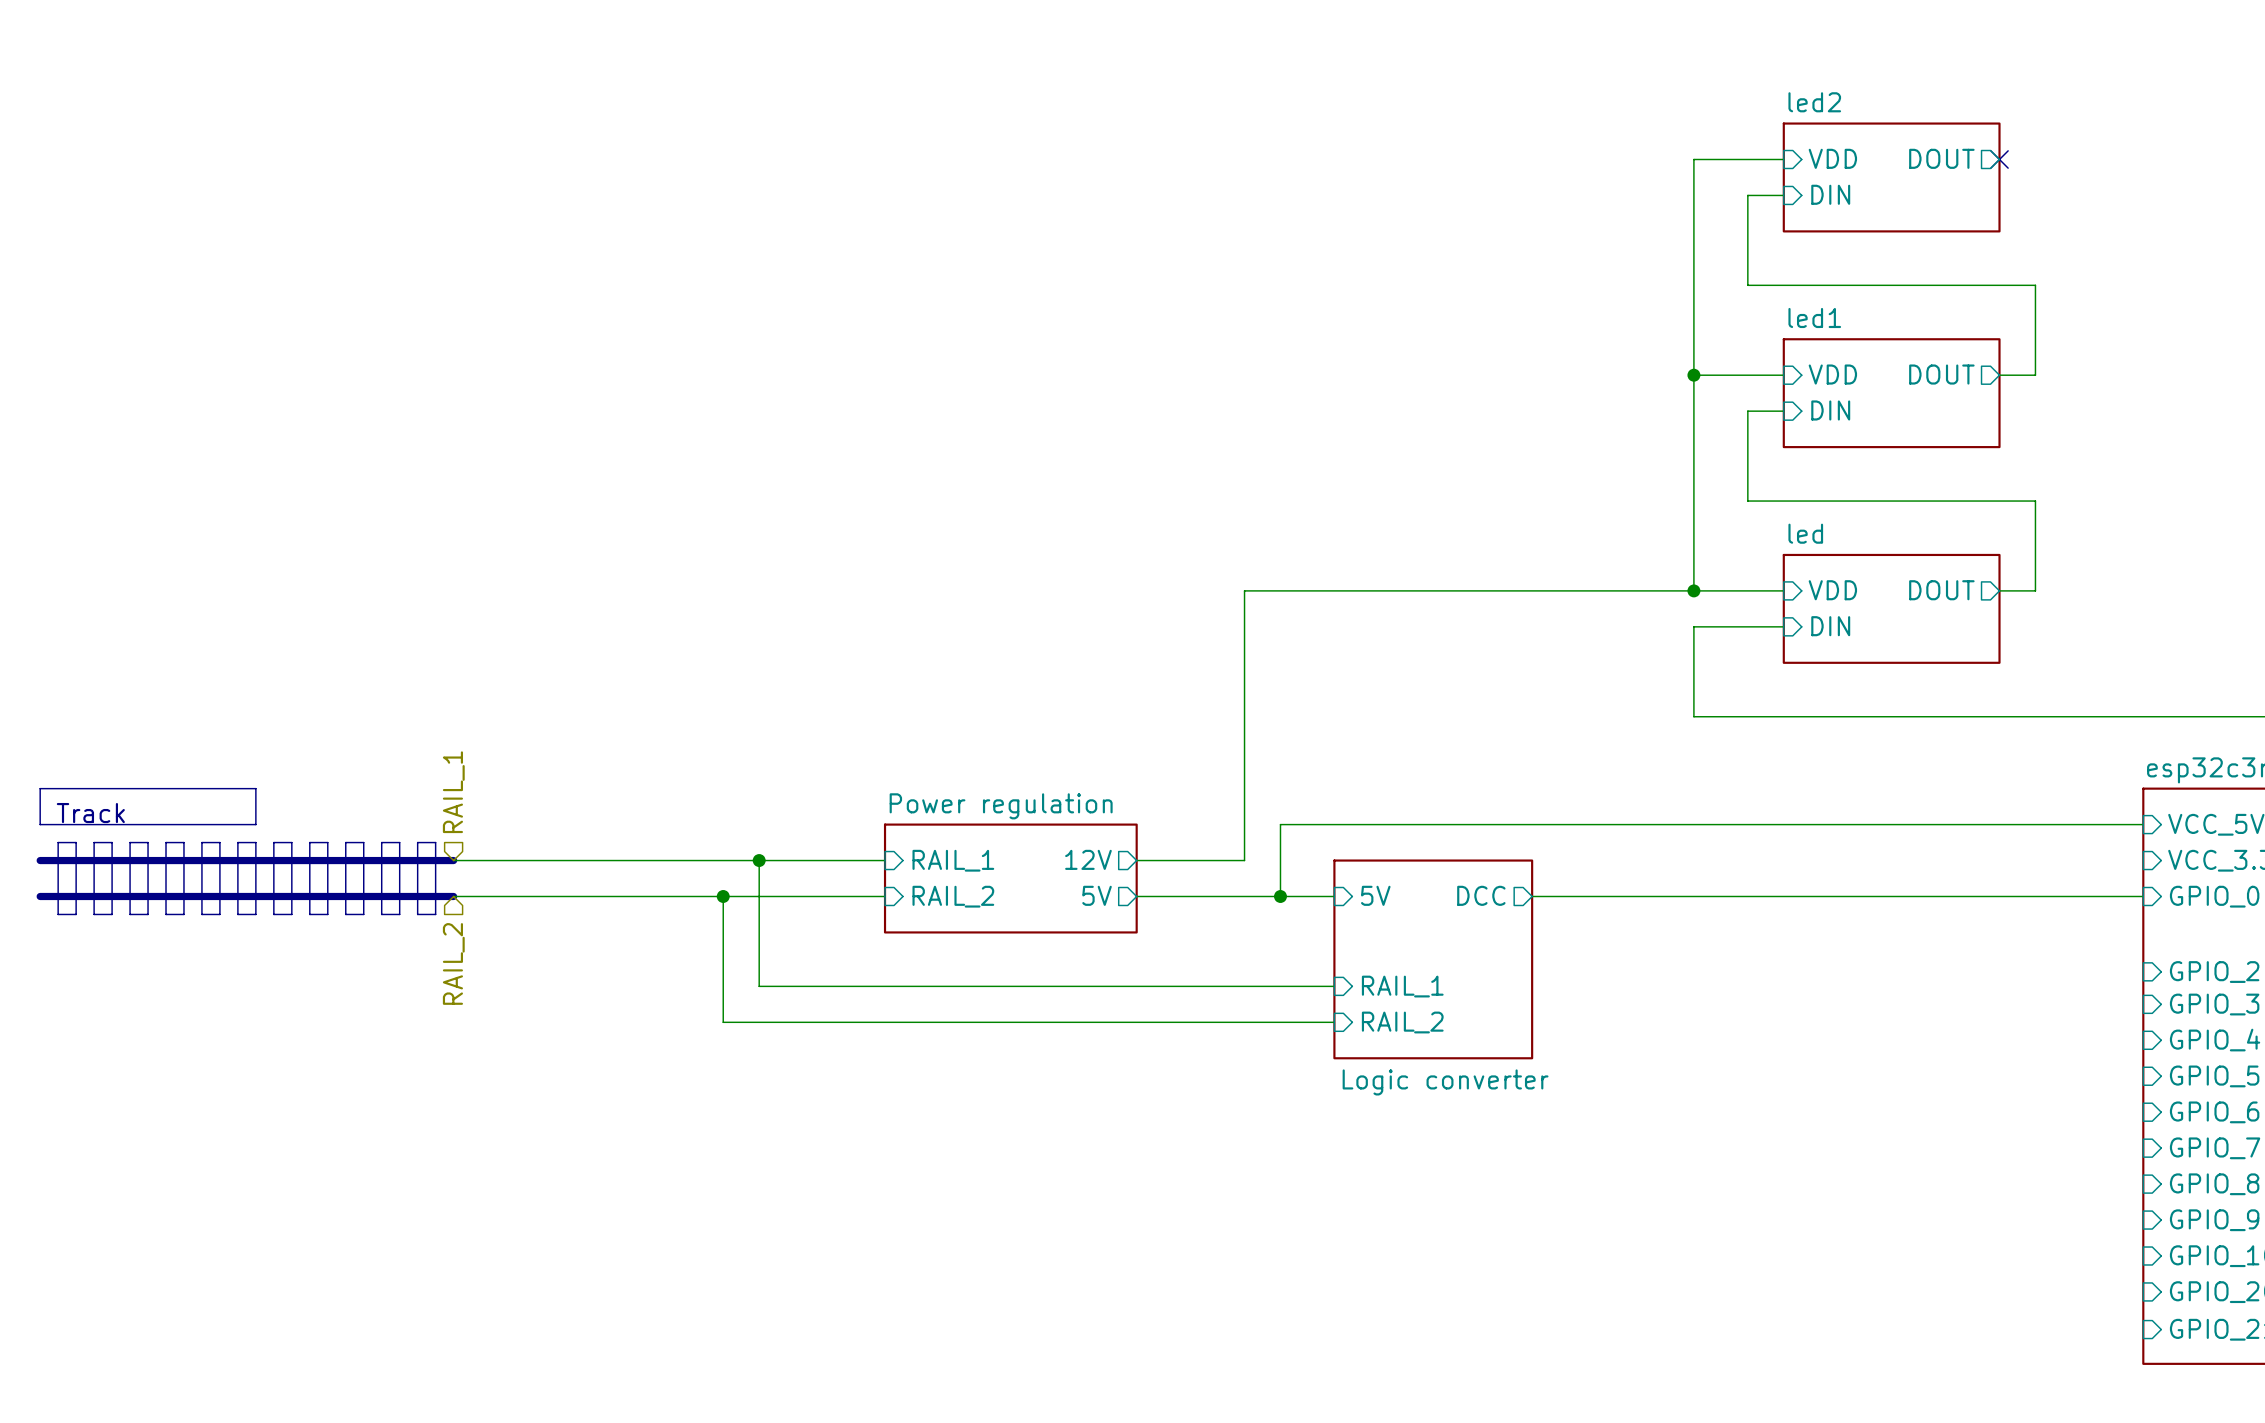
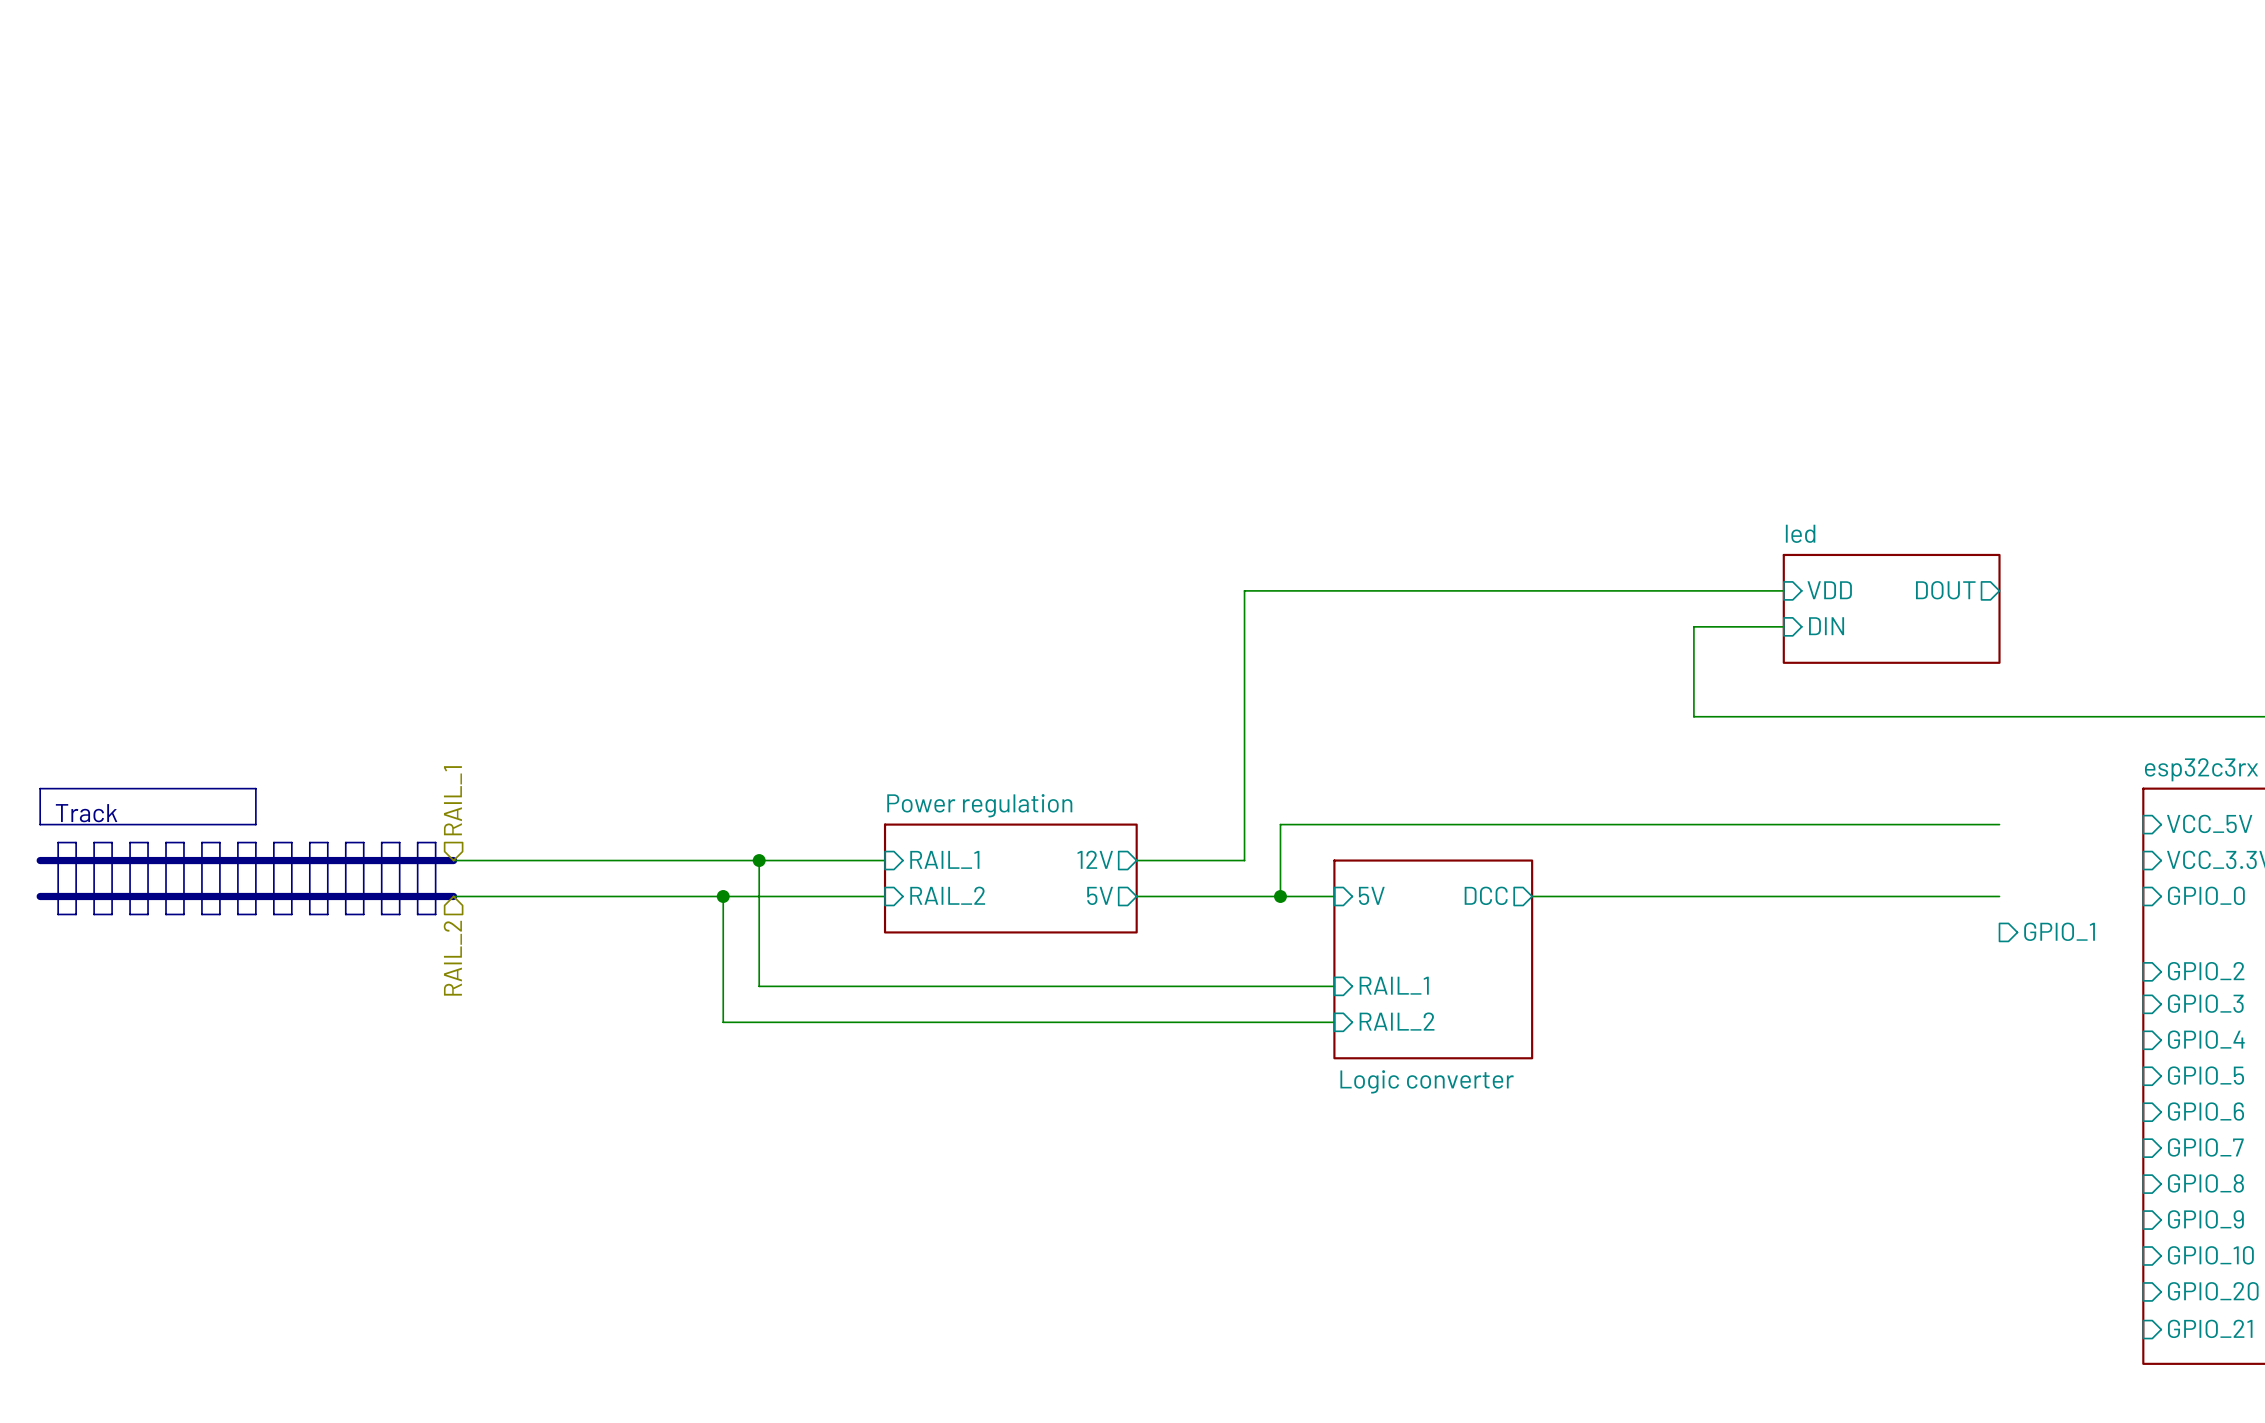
sheet pin: VDD (1832, 158) -> none
sheet pin: DOUT (1941, 158) -> none
wire: (1783, 159) (1693, 159) (1693, 590) -> none
no-connect mark: (1999, 159) -> none
sheet led2: (1891, 177) -> none
sheet pin: DIN (1830, 194) -> none
wire: (1783, 195) (1747, 195) (1747, 285) (2035, 285) (2035, 375) (1999, 375) -> none
sheet pin: VDD (1832, 374) -> none
sheet pin: DOUT (1941, 374) -> none
wire: (1693, 375) (1783, 375) -> none
junction: (1693, 375) -> none
sheet led1: (1891, 393) -> none
sheet pin: DIN (1830, 410) -> none
wire: (1783, 411) (1747, 411) (1747, 501) (2035, 501) (2035, 590) (1999, 590) -> none
junction: (1693, 590) -> none
wire: (1999, 824) (2143, 824) -> none
wire: (1999, 896) (2143, 896) -> none
sheet pin: none -> GPIO_1 (2059, 931)

